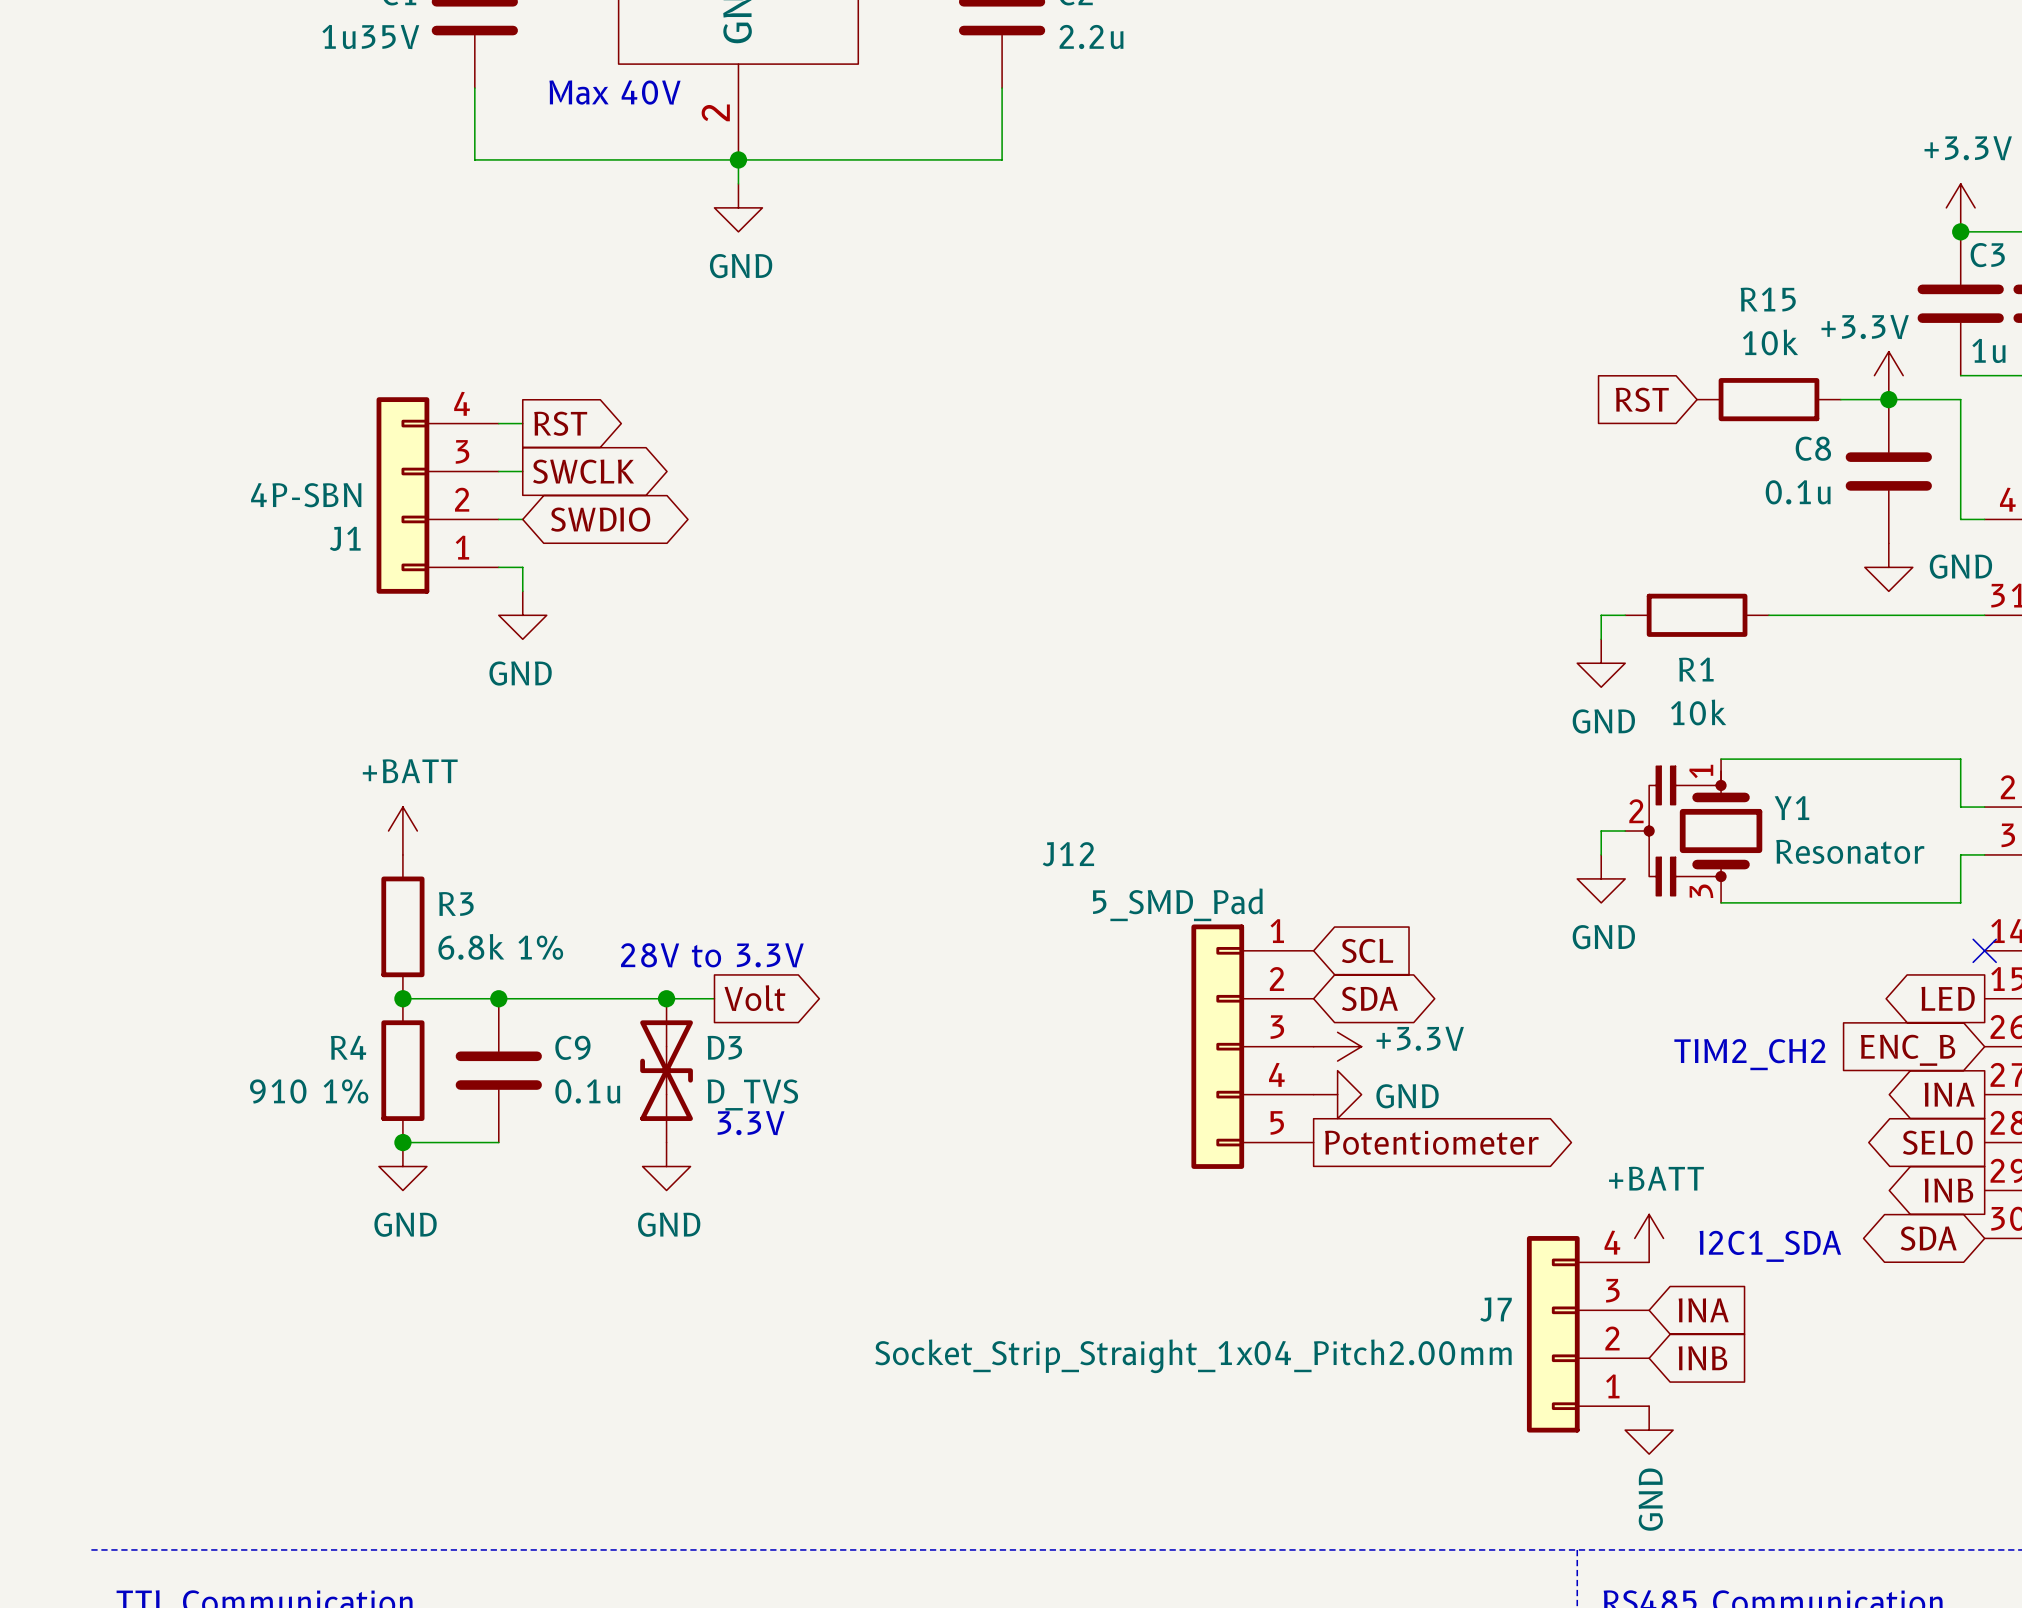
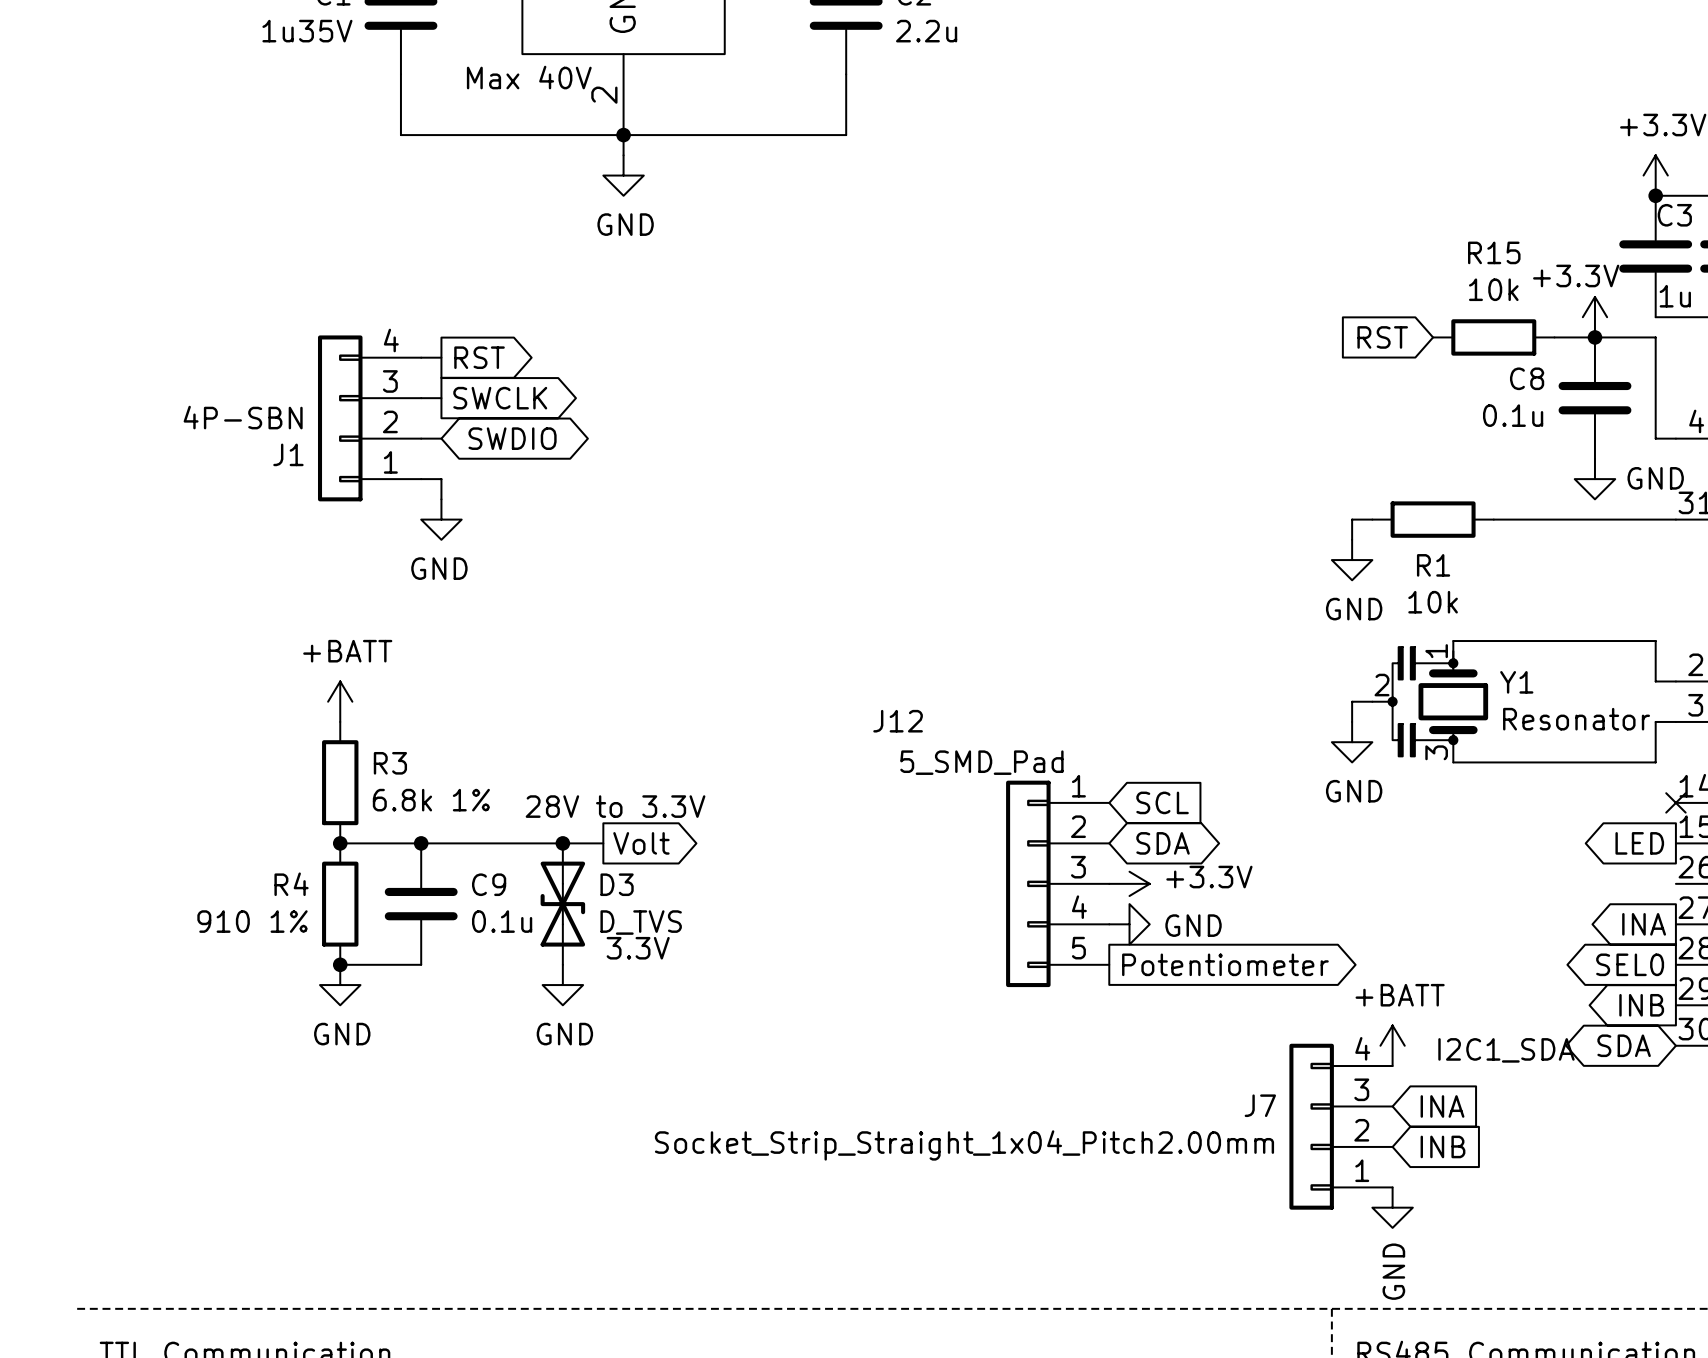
global label: ENC_B (1908, 1050) -> none
text: TIM2_CH2 (1749, 1054) -> none

